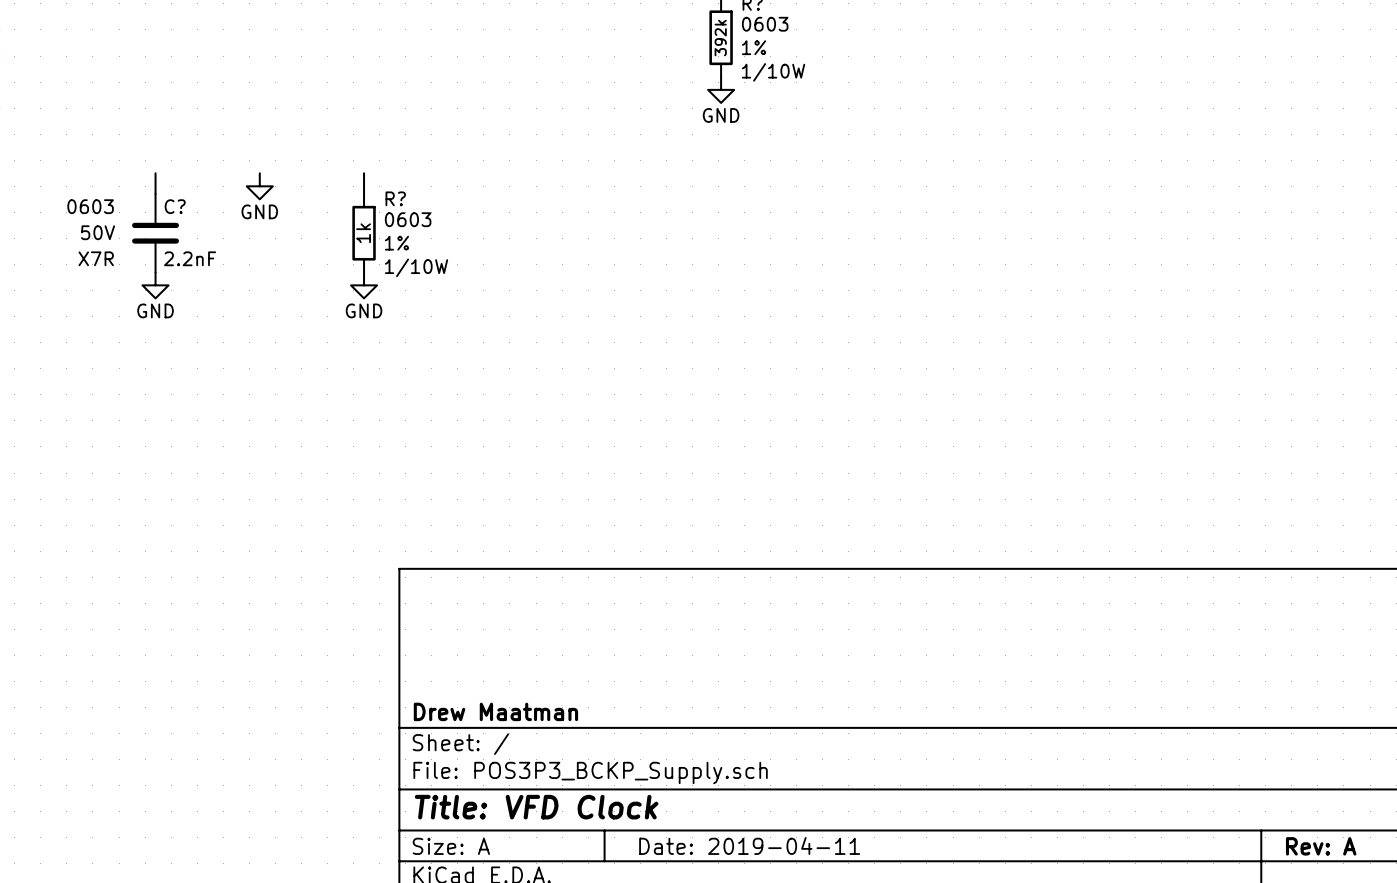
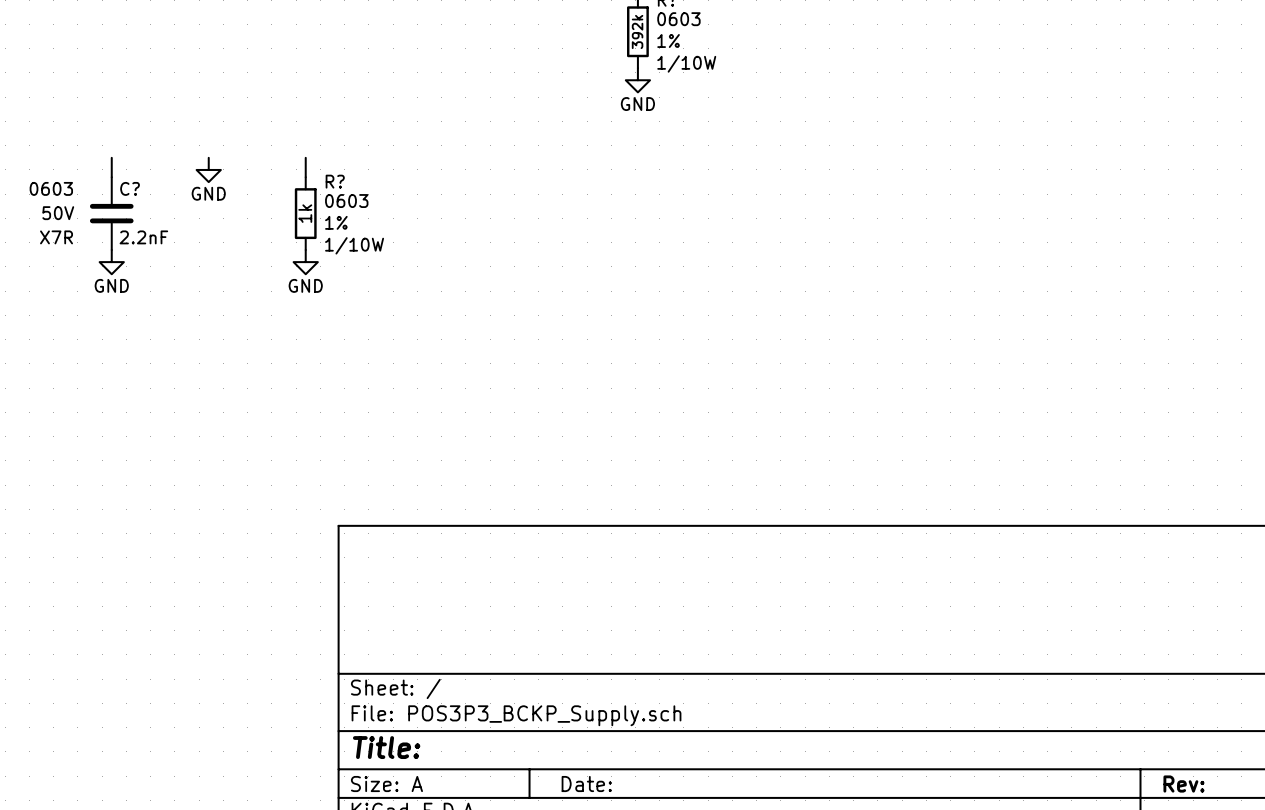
title block: Drew Maatman (495, 711) -> none
title block: Title: VFD Clock (536, 807) -> Title: (386, 747)
title block: Date: 2019-04-11 (749, 845) -> Date: (586, 784)
title block: Rev: A (1321, 846) -> Rev: (1183, 784)

